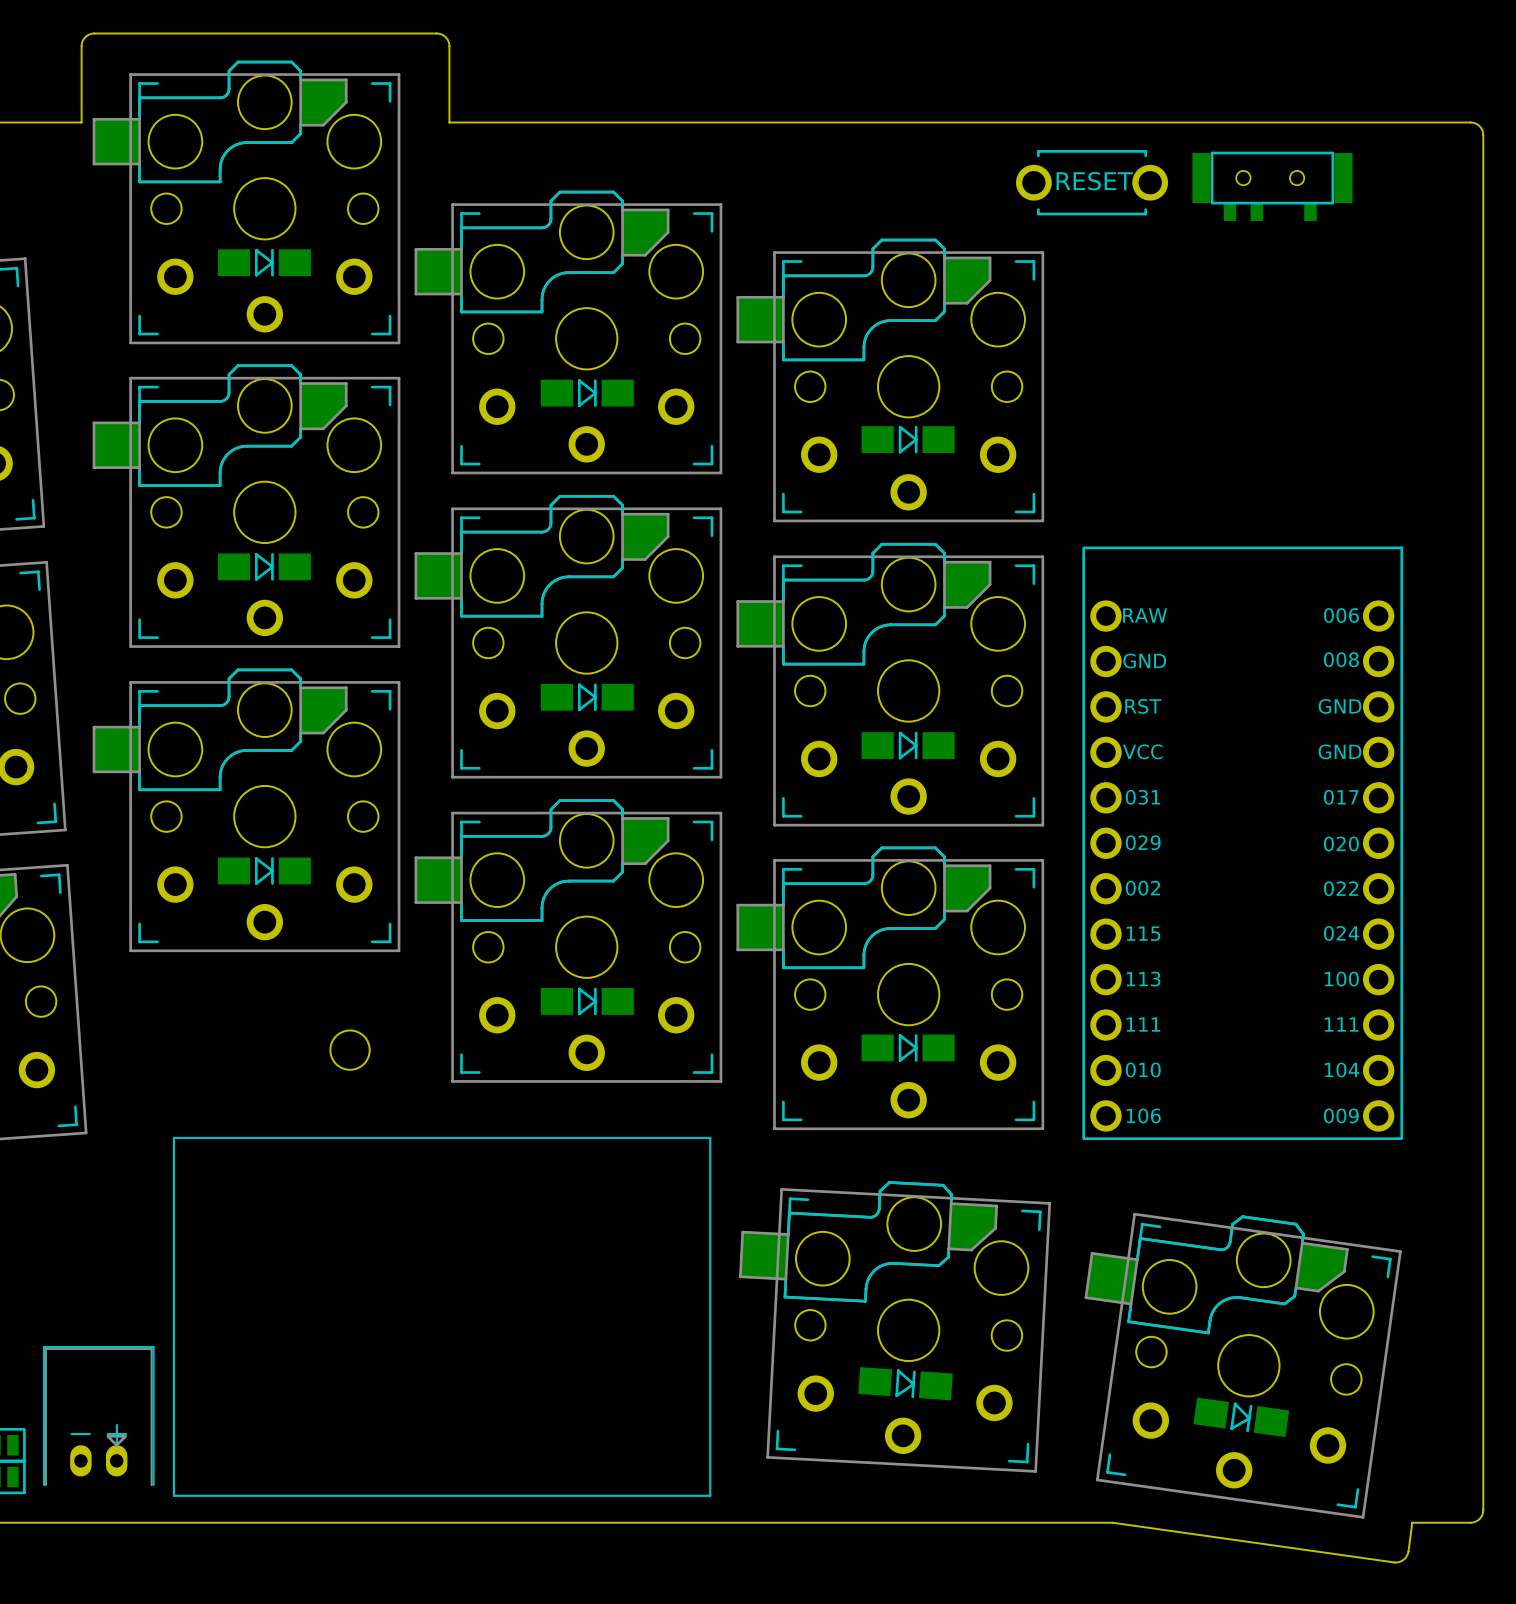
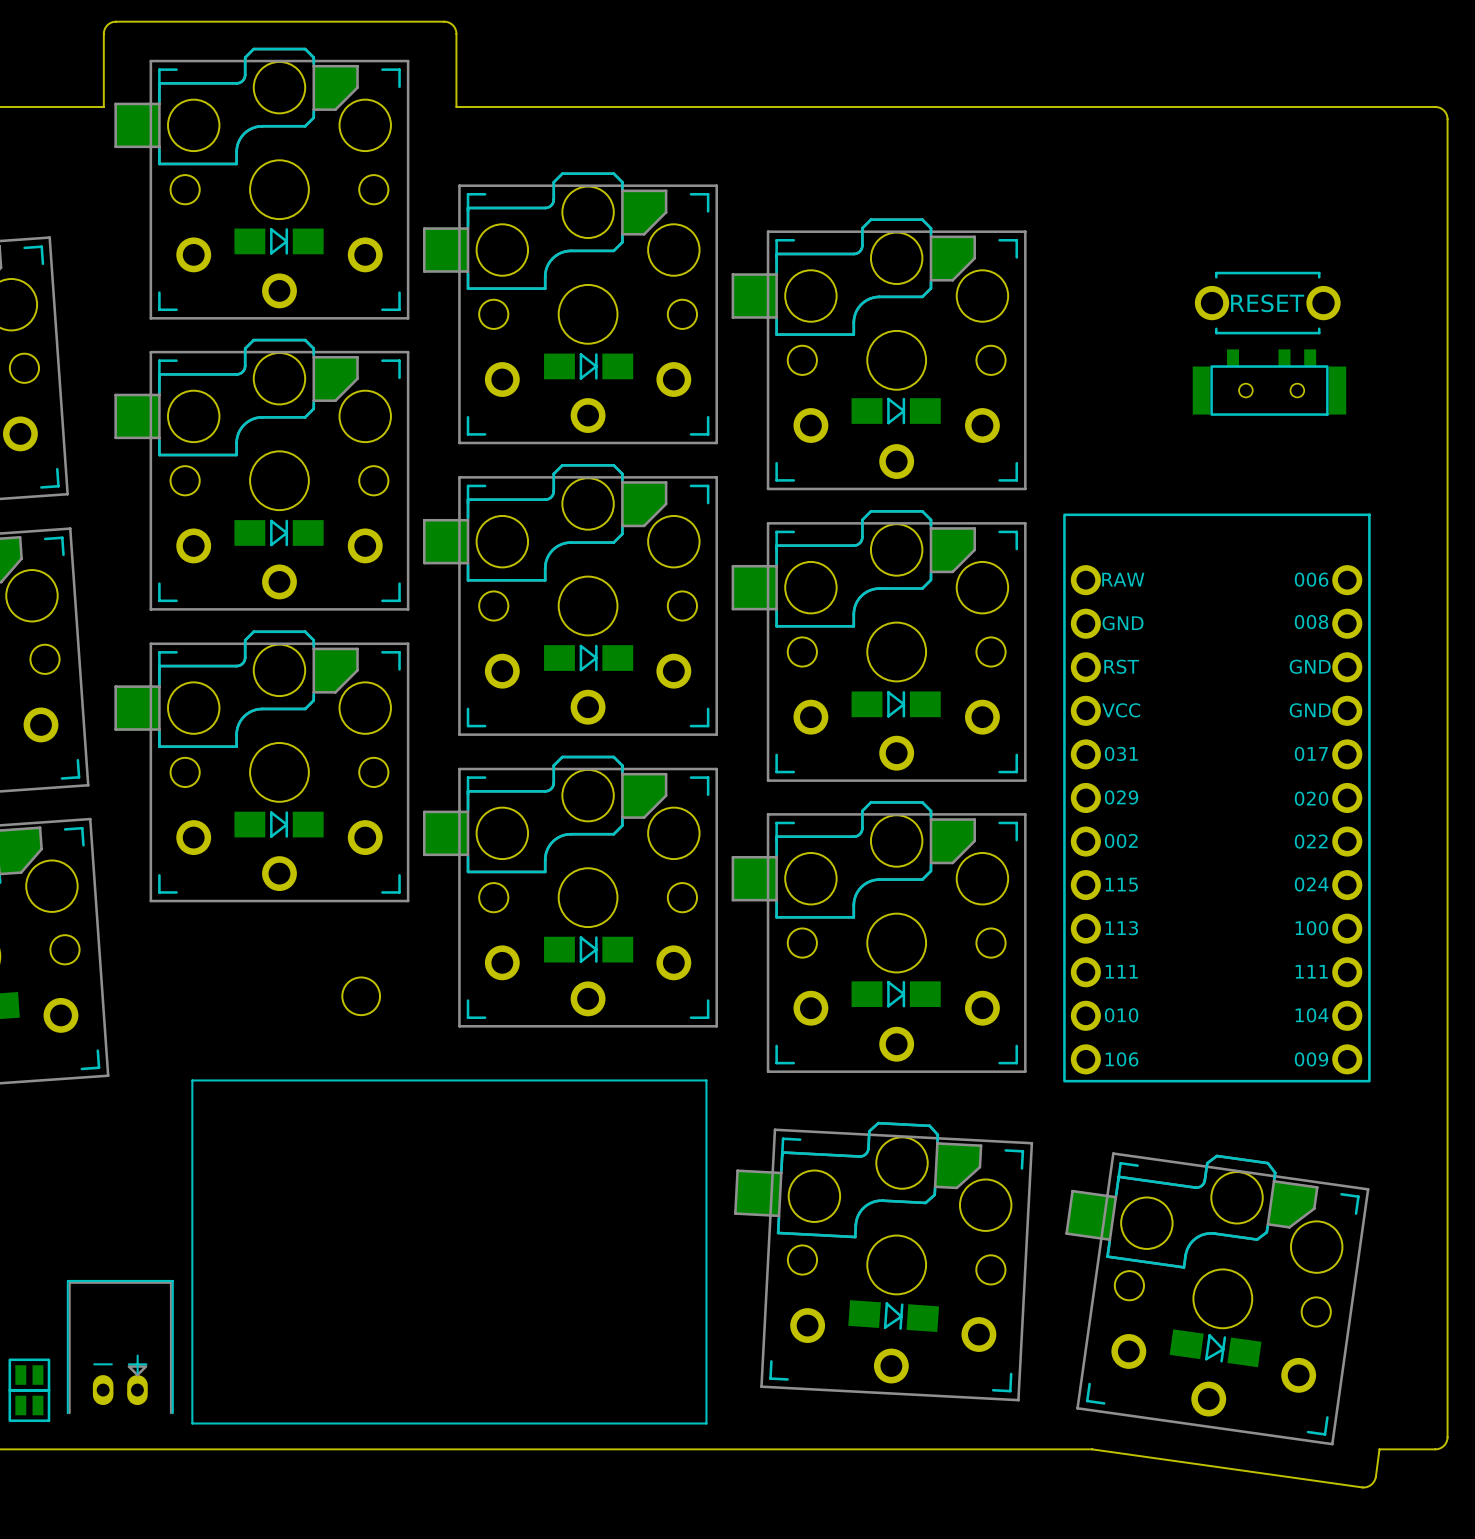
part rotation: 0° (1092, 182) -> 180° (1267, 303)
part position: (1092, 182) -> (1267, 303)
part rotation: 0° (1272, 186) -> 180° (1269, 382)
part position: (1272, 186) -> (1269, 382)

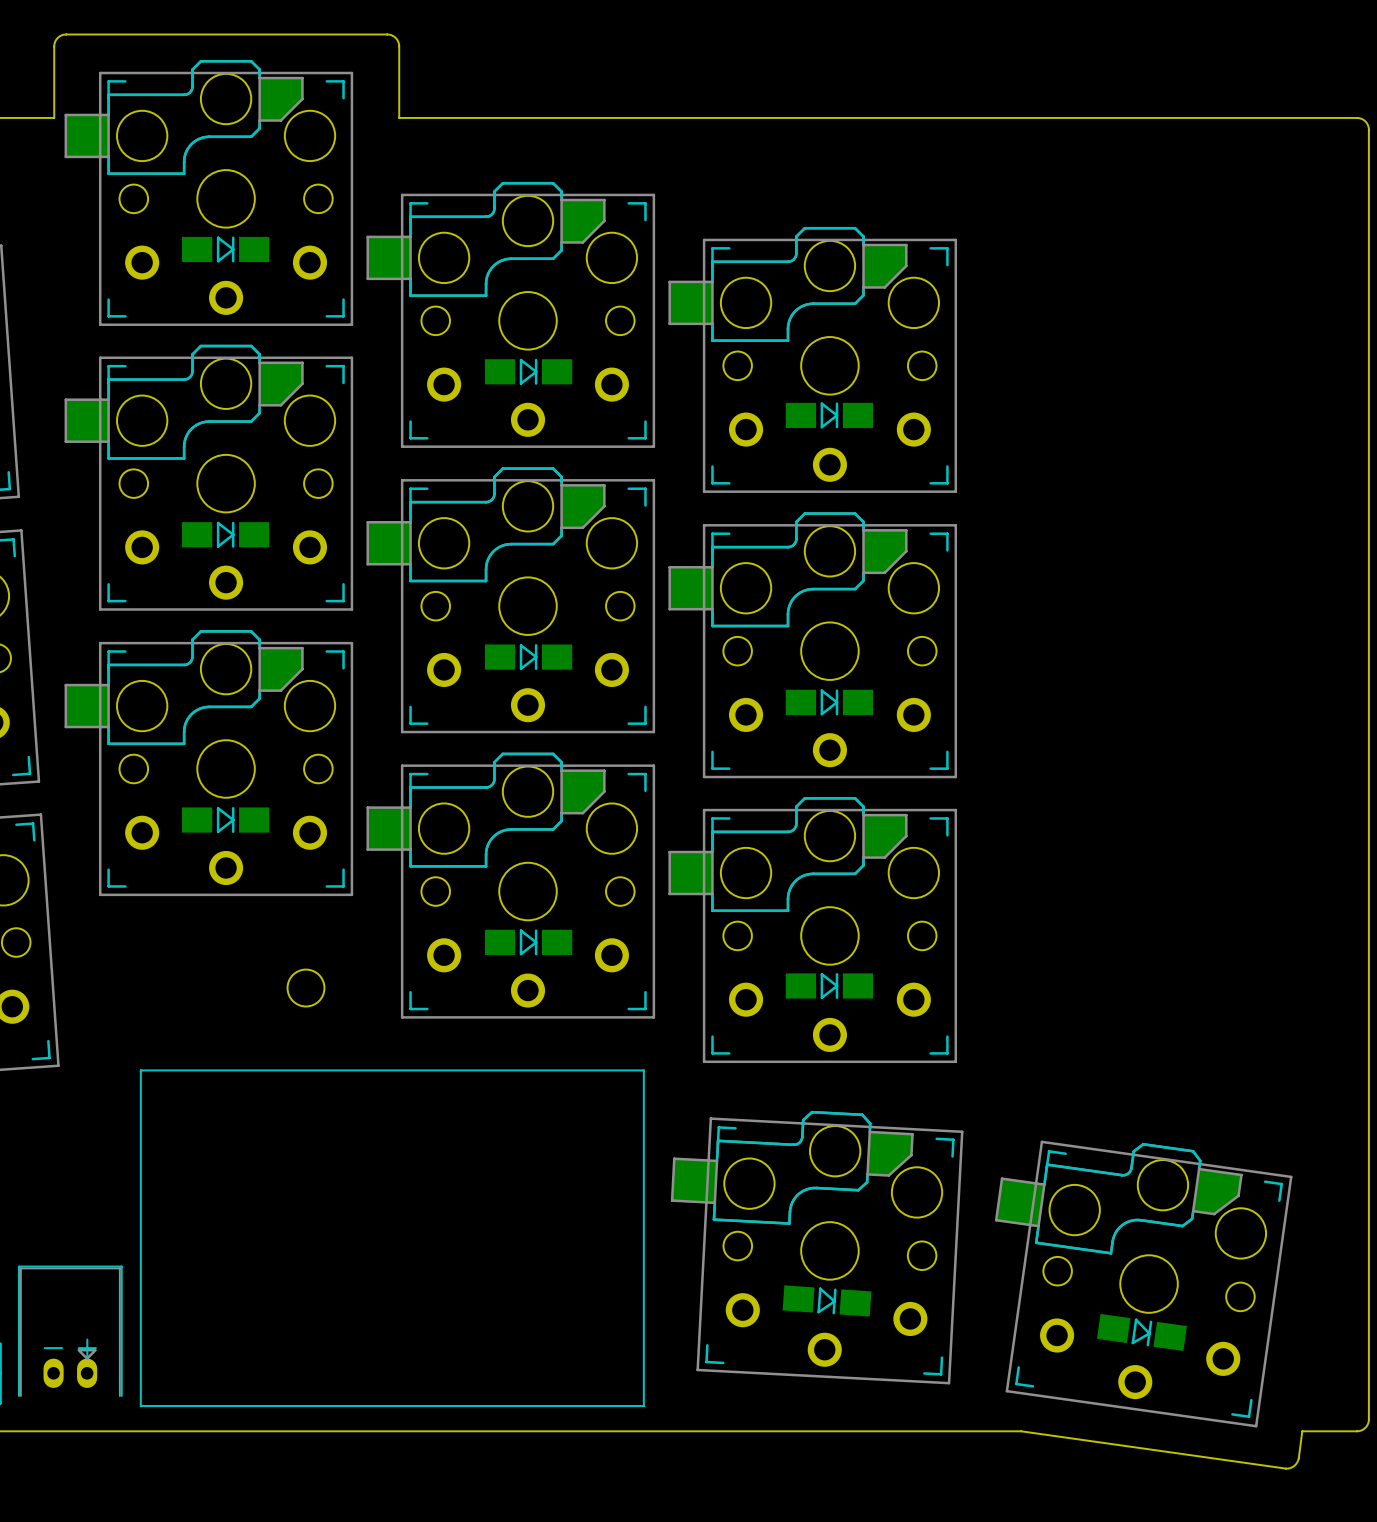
part: (1267, 303) -> none
part: (1269, 382) -> none
part: (1216, 797) -> none

